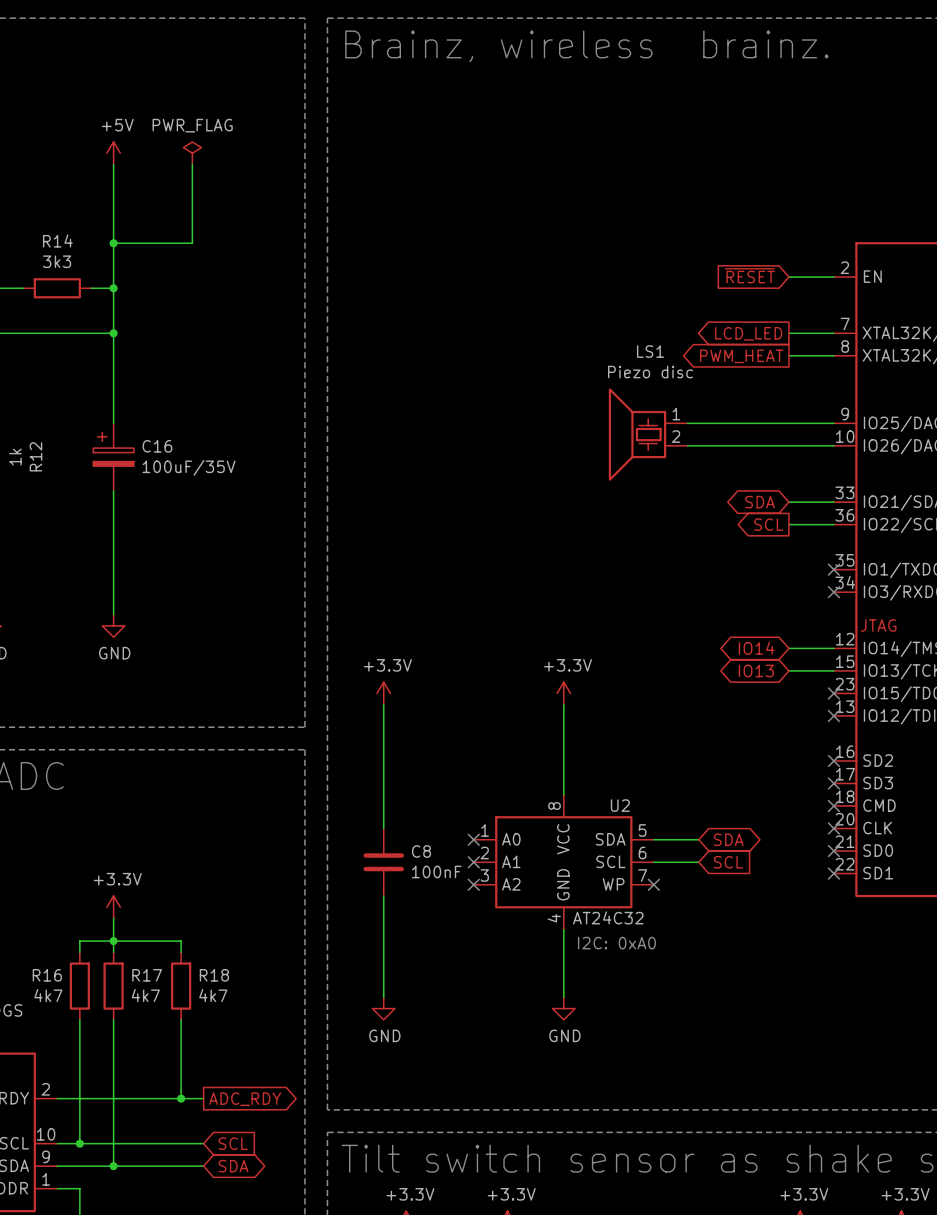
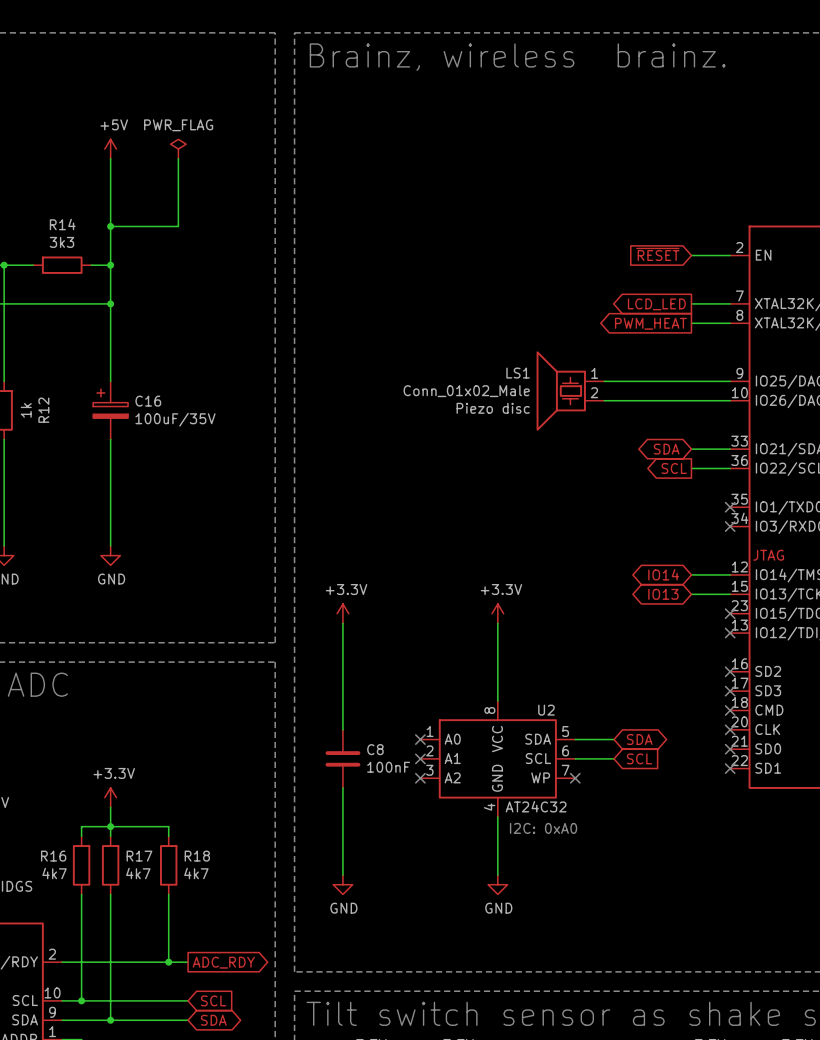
LS1 name position: LS1 (650, 351) -> LS1 (518, 373)
LS1 value: Piezo disc (650, 372) -> Conn_01x02_Male (466, 391)
LS1 text: none -> Piezo disc (493, 408)

